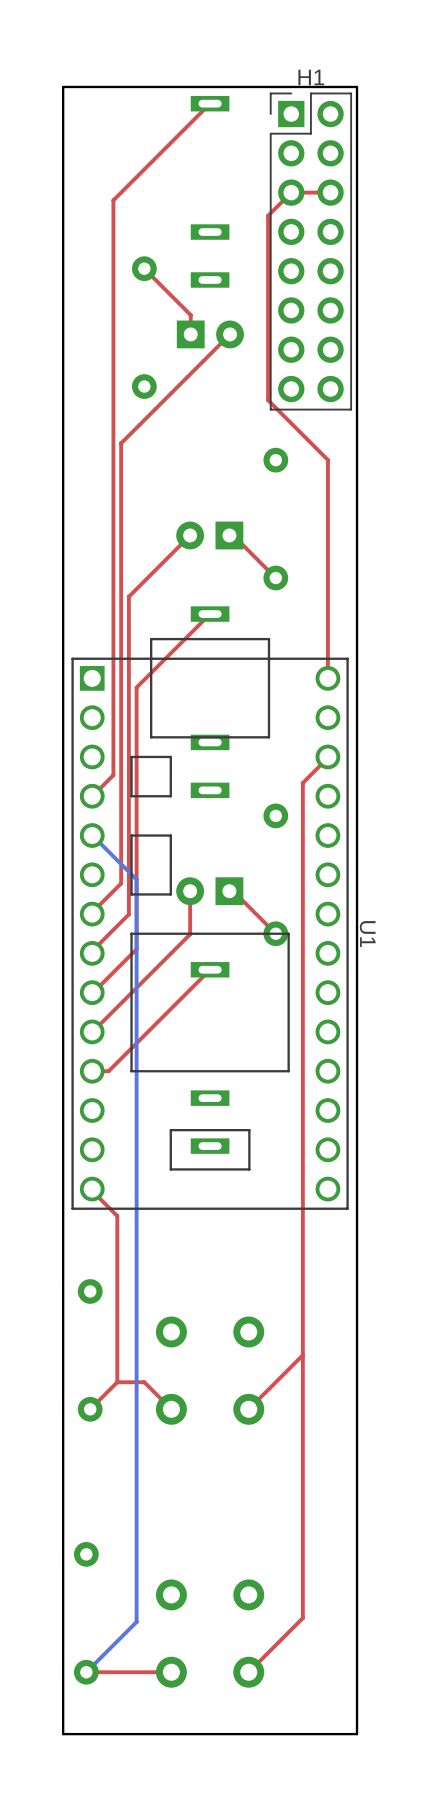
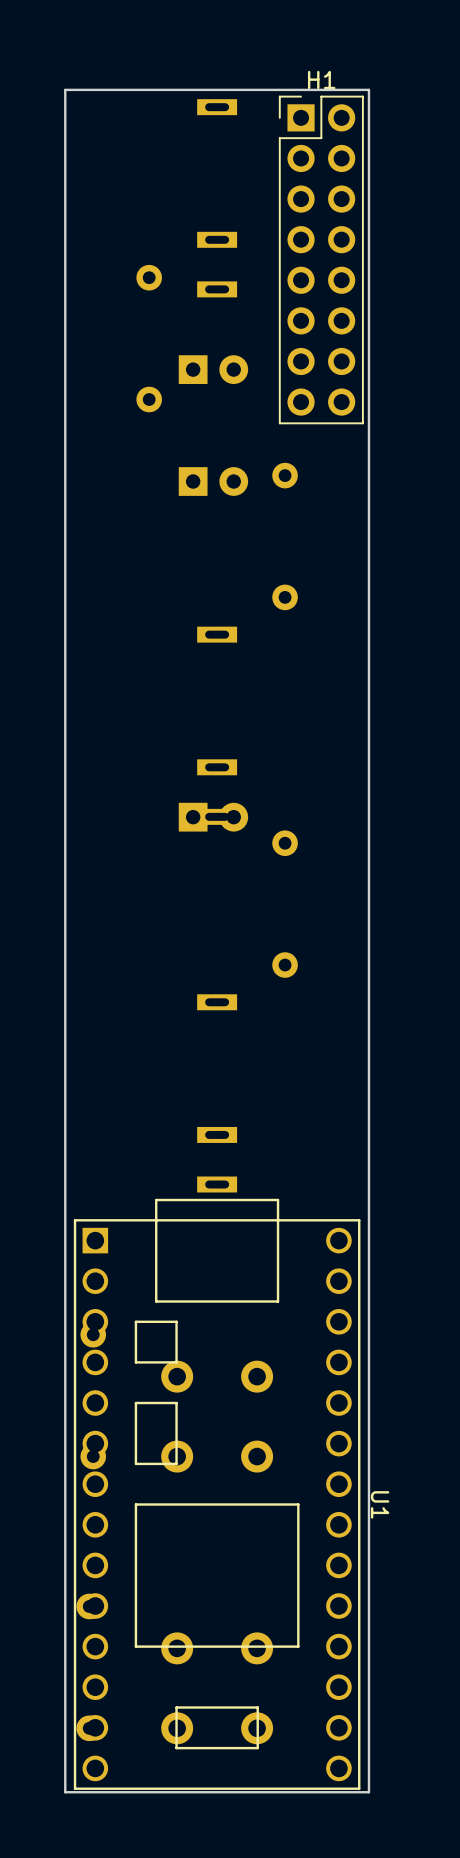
top track: (210, 103) (113, 200) (113, 775) (92, 796) -> none
top track: (330, 192) (291, 192) (268, 215) (268, 400) (327, 460) (327, 678) -> none
top track: (144, 268) (190, 315) (190, 334) -> none
part position: (210, 334) -> (213, 369)
top track: (230, 334) (121, 443) (121, 883) (92, 914) -> none
part: none -> (213, 481)
top track: (190, 535) (128, 596) (128, 914) (92, 951) (92, 953) -> none
part: (209, 535) -> none
top track: (229, 535) (233, 535) (275, 578) -> none
top track: (210, 614) (136, 687) (136, 949) (92, 992) -> none
top track: (327, 756) (302, 782) (302, 1618) (248, 1672) -> none
bottom track: (92, 835) (136, 879) (136, 1621) (86, 1672) -> none
top track: (190, 891) (190, 934) (92, 1031) -> none
part rotation: 0° (209, 891) -> 180° (213, 817)
part position: (209, 891) -> (213, 817)
top track: (229, 891) (233, 891) (275, 933) -> none
U1 position: (210, 923) -> (217, 1494)
top track: (210, 969) (108, 1071) (92, 1071) -> none
top track: (92, 1189) (117, 1215) (117, 1382) -> none
top track: (302, 1355) (248, 1409) -> none
top track: (117, 1382) (144, 1382) (171, 1409) -> none
top track: (117, 1382) (90, 1409) -> none
top track: (171, 1672) (86, 1672) -> none

